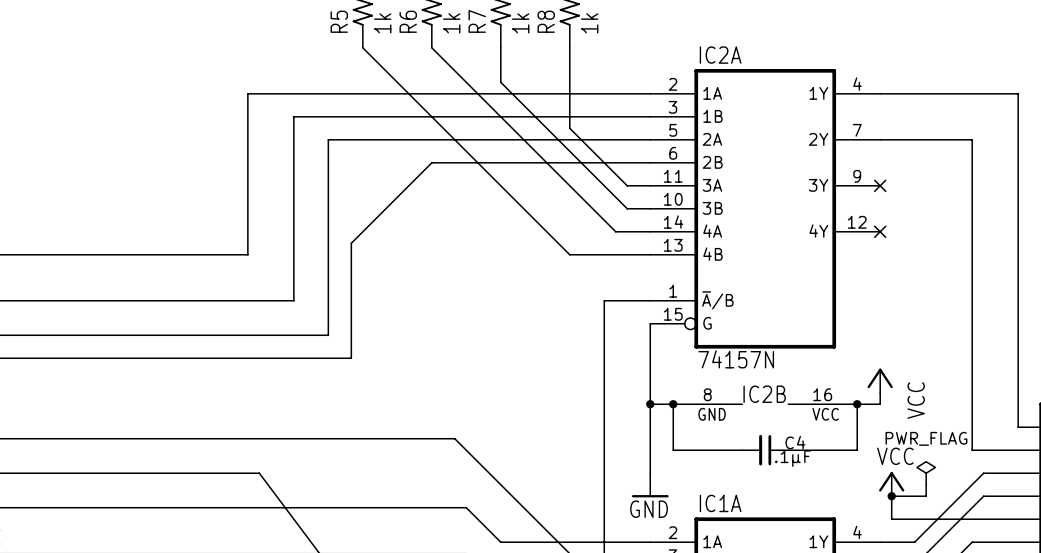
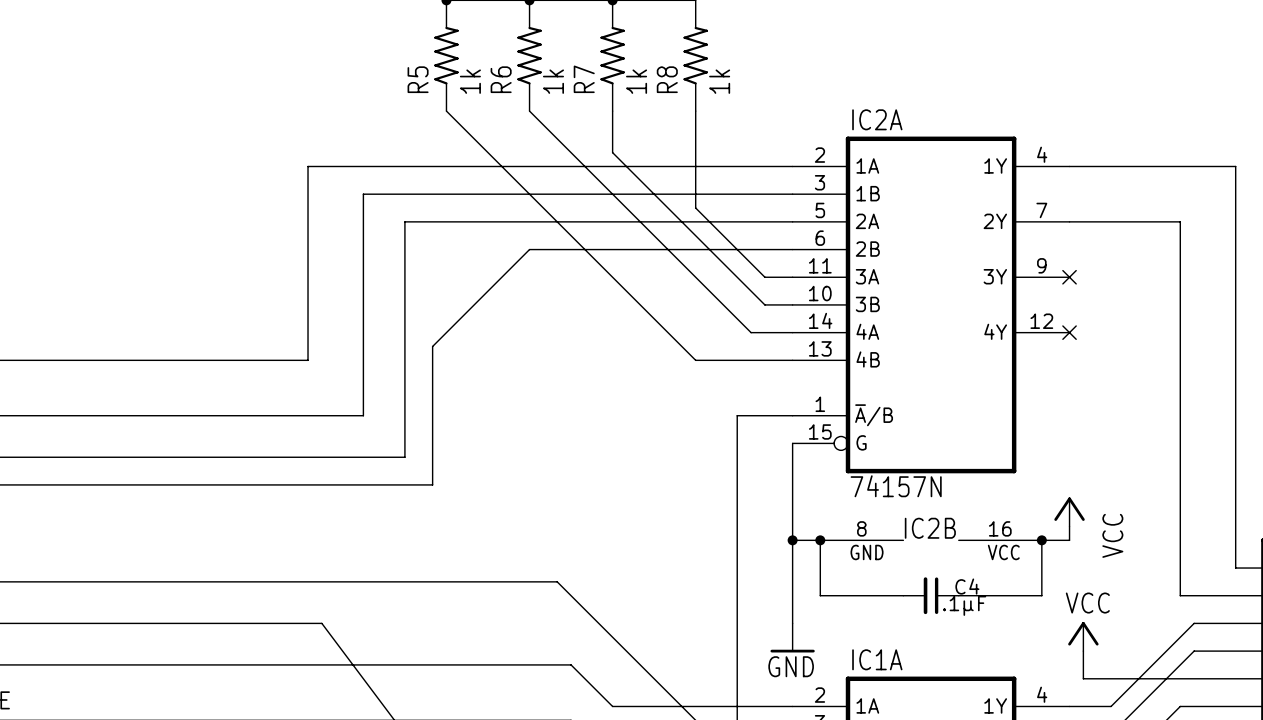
power symbol: PWR_FLAG (926, 473) -> none
wire: (926, 484) (926, 496) (891, 496) -> none
junction: (891, 496) -> none

